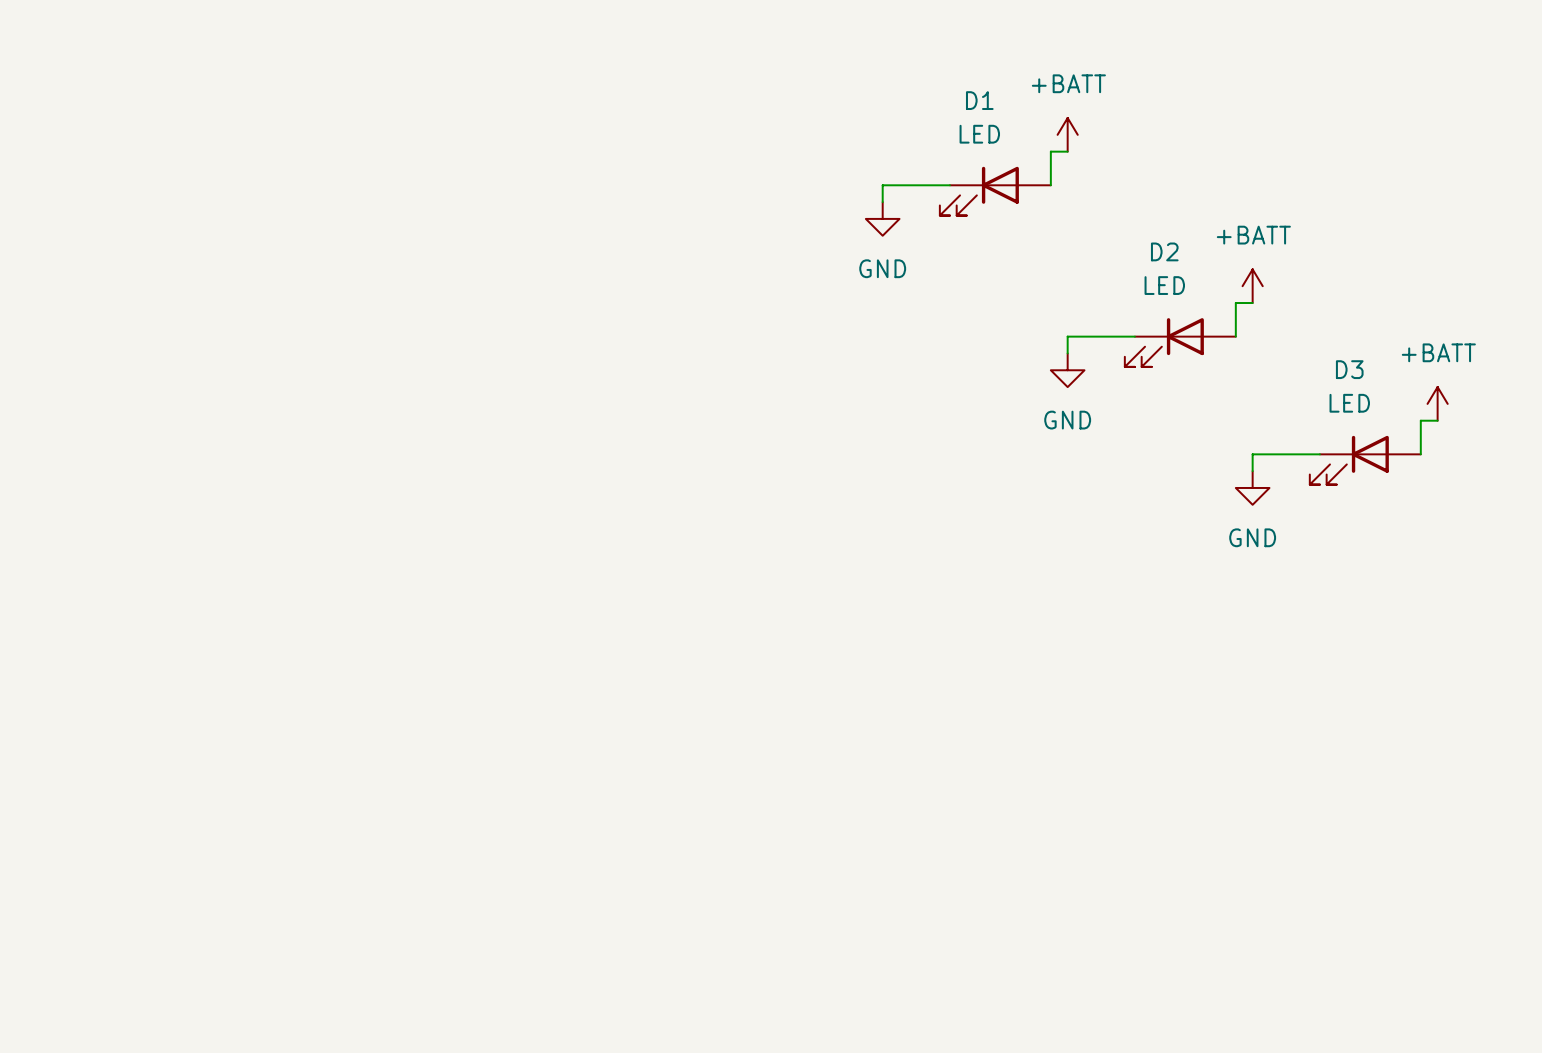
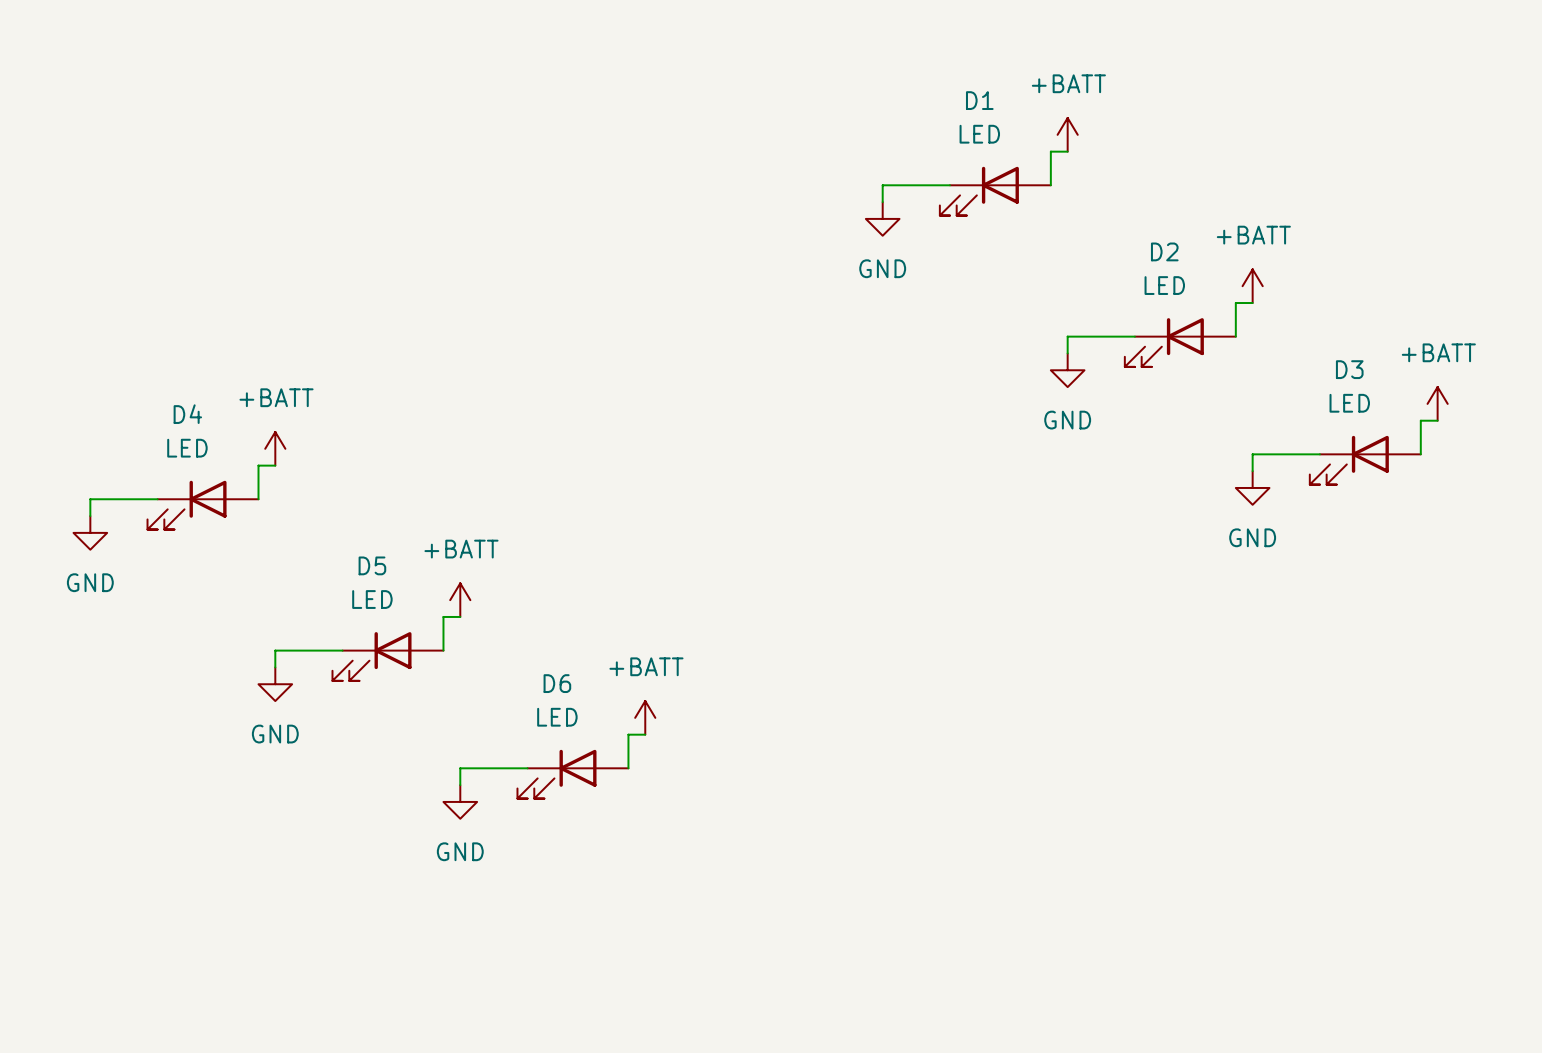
power symbol: none -> +BATT (275, 448)
wire: none -> (275, 465) (258, 465) (258, 499)
wire: none -> (157, 499) (90, 499) (90, 516)
D4: none -> LED (203, 505)
power symbol: none -> GND (90, 532)
power symbol: none -> +BATT (460, 600)
wire: none -> (460, 616) (443, 616) (443, 650)
wire: none -> (342, 650) (275, 650) (275, 667)
D5: none -> LED (387, 656)
power symbol: none -> GND (275, 684)
power symbol: none -> +BATT (645, 717)
wire: none -> (645, 734) (628, 734) (628, 768)
wire: none -> (527, 768) (460, 768) (460, 785)
D6: none -> LED (572, 774)
power symbol: none -> GND (460, 801)

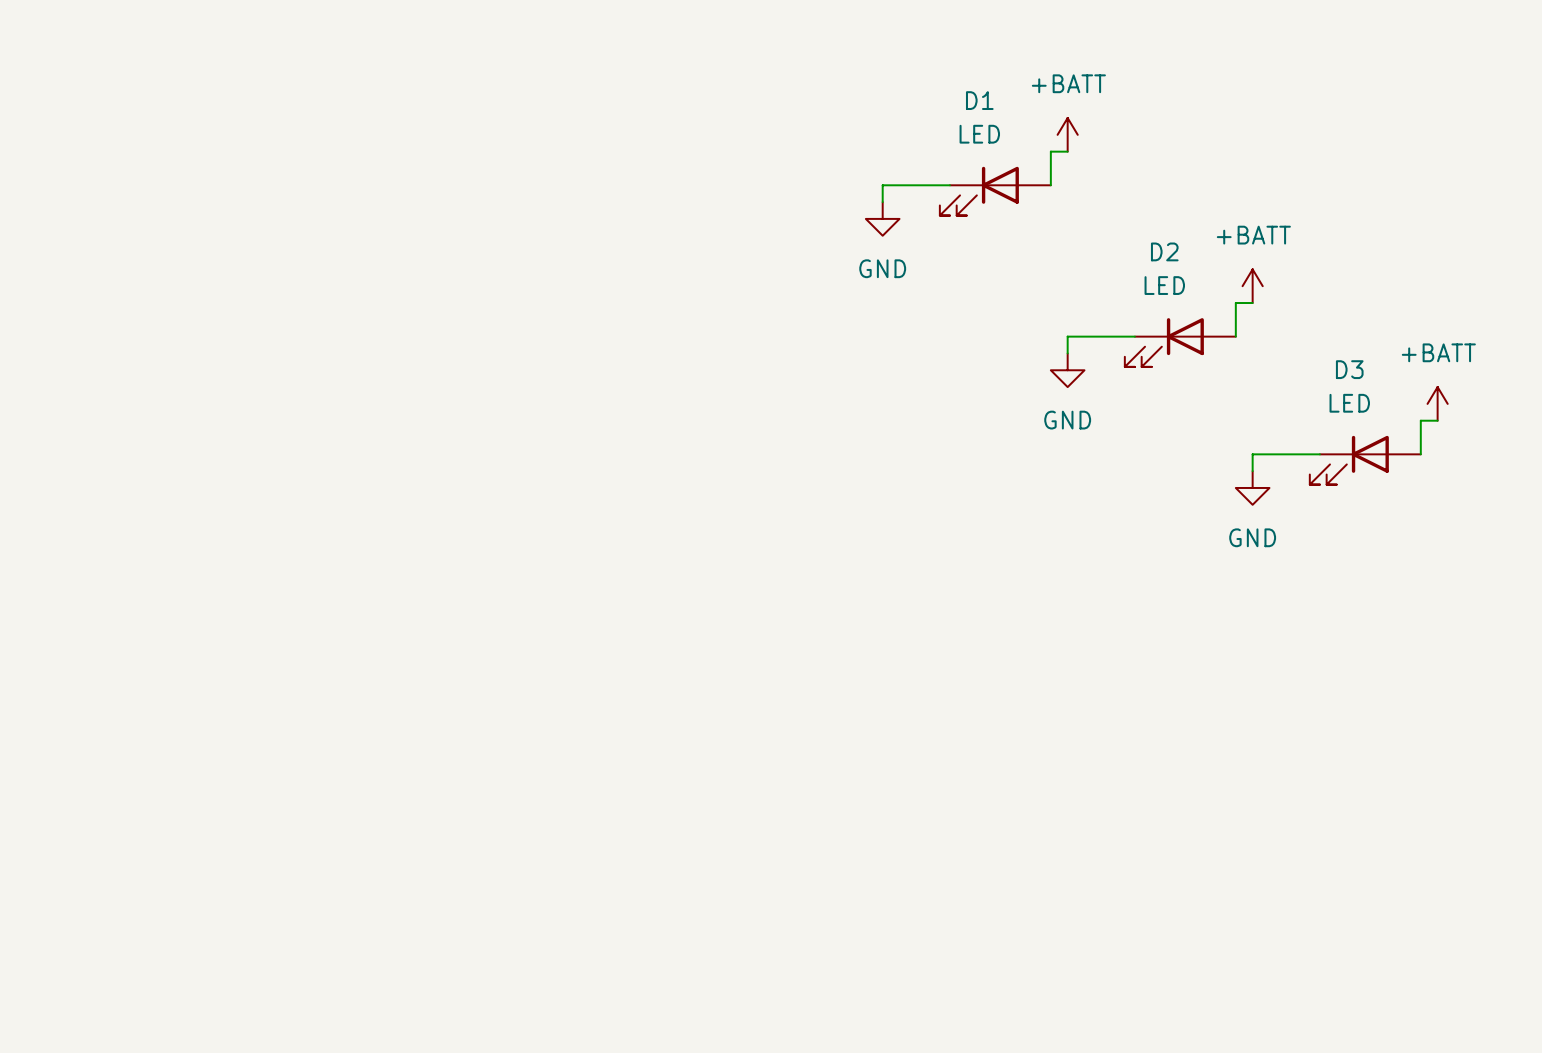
power symbol: +BATT (275, 448) -> none
wire: (275, 465) (258, 465) (258, 499) -> none
wire: (157, 499) (90, 499) (90, 516) -> none
D4: LED (203, 505) -> none
power symbol: GND (90, 532) -> none
power symbol: +BATT (460, 600) -> none
wire: (460, 616) (443, 616) (443, 650) -> none
wire: (342, 650) (275, 650) (275, 667) -> none
D5: LED (387, 656) -> none
power symbol: GND (275, 684) -> none
power symbol: +BATT (645, 717) -> none
wire: (645, 734) (628, 734) (628, 768) -> none
wire: (527, 768) (460, 768) (460, 785) -> none
D6: LED (572, 774) -> none
power symbol: GND (460, 801) -> none

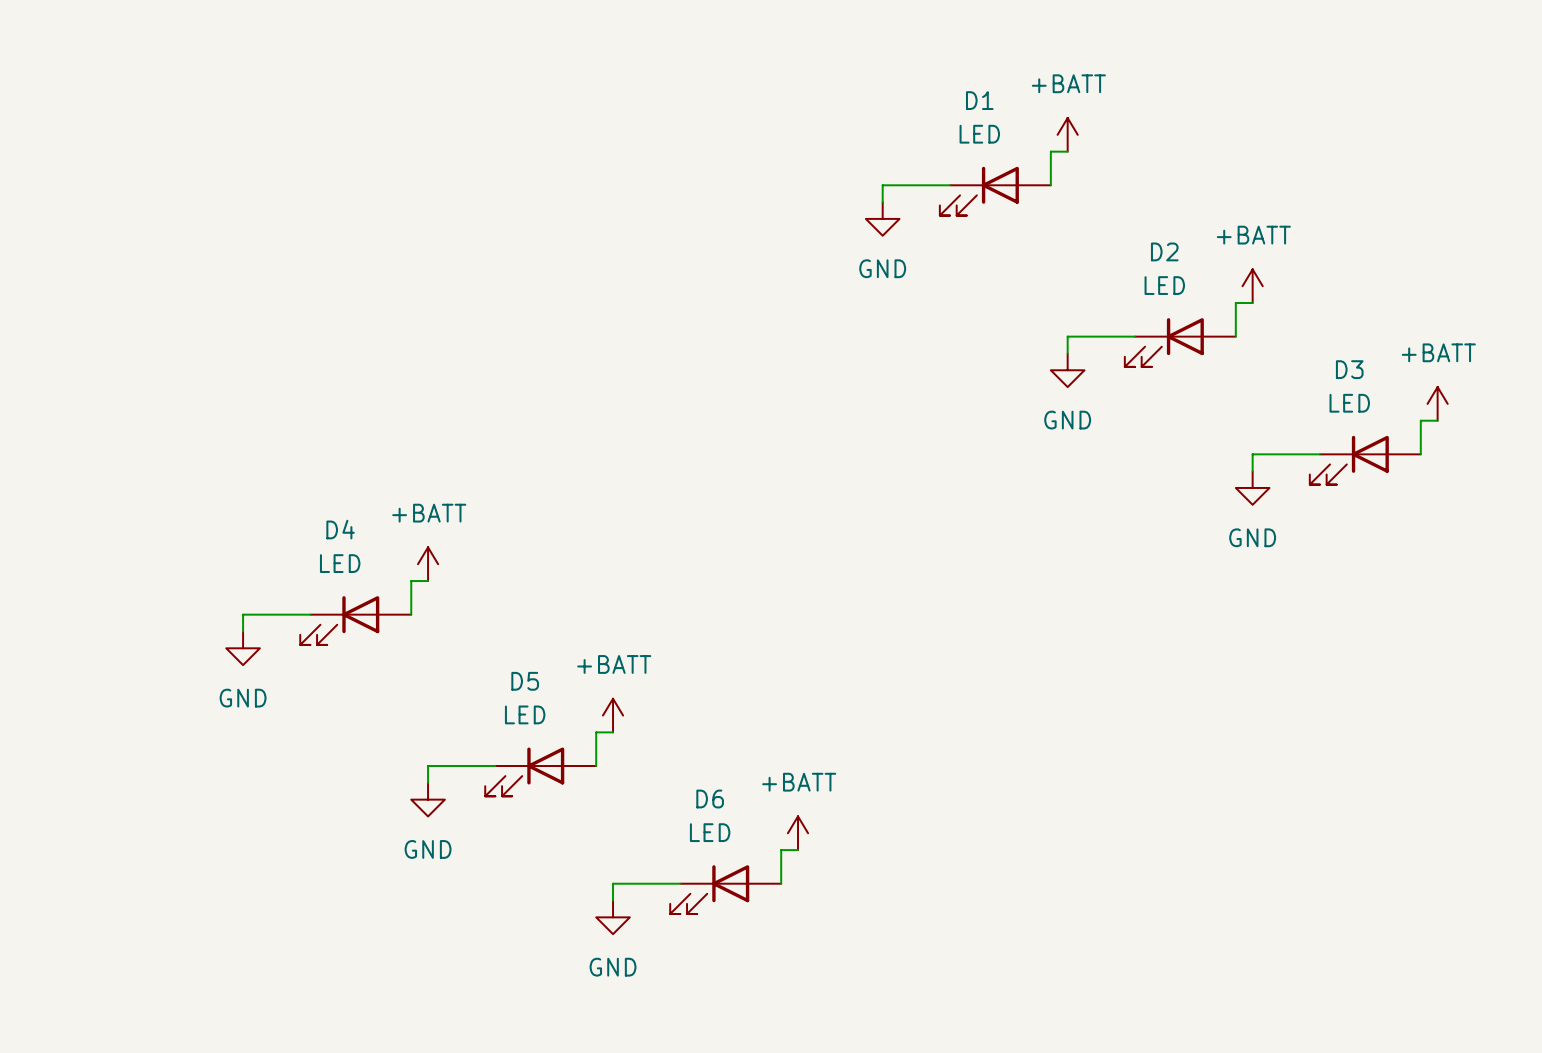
power symbol: none -> +BATT (428, 564)
wire: none -> (428, 581) (411, 581) (411, 614)
wire: none -> (310, 614) (243, 614) (243, 631)
D4: none -> LED (355, 620)
power symbol: none -> GND (243, 648)
power symbol: none -> +BATT (613, 715)
wire: none -> (613, 732) (596, 732) (596, 766)
wire: none -> (495, 766) (428, 766) (428, 782)
D5: none -> LED (540, 771)
power symbol: none -> GND (428, 799)
power symbol: none -> +BATT (798, 833)
wire: none -> (798, 850) (781, 850) (781, 883)
wire: none -> (680, 883) (613, 883) (613, 900)
D6: none -> LED (725, 889)
power symbol: none -> GND (613, 917)

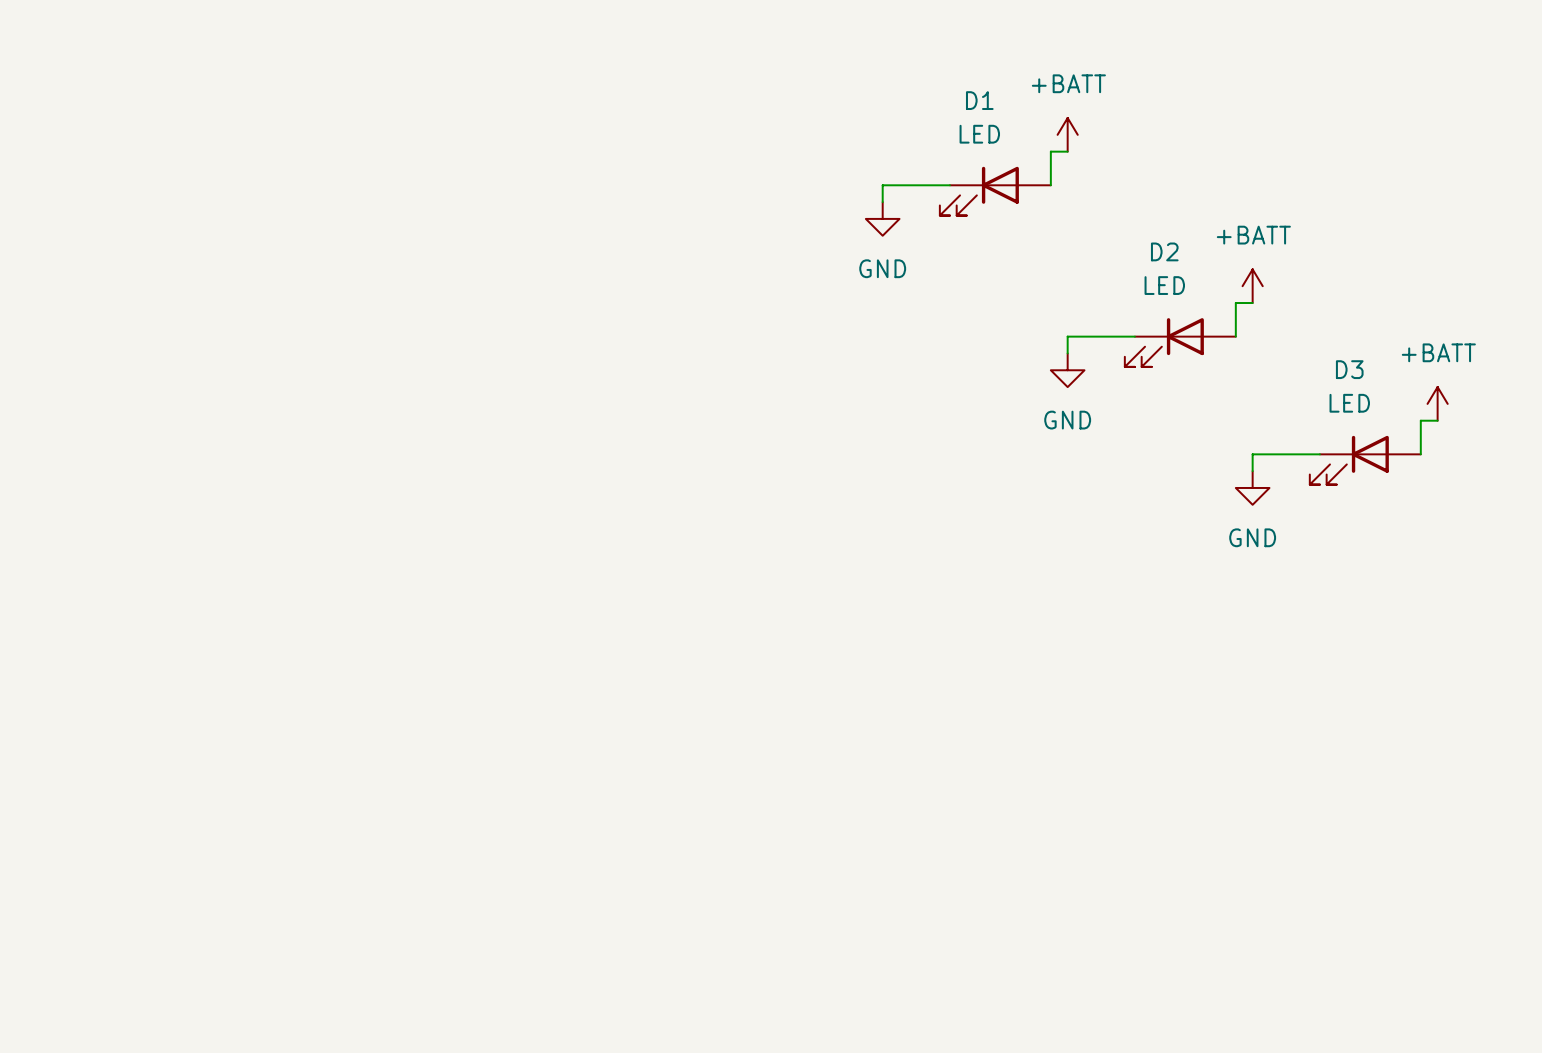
power symbol: +BATT (428, 564) -> none
wire: (428, 581) (411, 581) (411, 614) -> none
wire: (310, 614) (243, 614) (243, 631) -> none
D4: LED (355, 620) -> none
power symbol: GND (243, 648) -> none
power symbol: +BATT (613, 715) -> none
wire: (613, 732) (596, 732) (596, 766) -> none
wire: (495, 766) (428, 766) (428, 782) -> none
D5: LED (540, 771) -> none
power symbol: GND (428, 799) -> none
power symbol: +BATT (798, 833) -> none
wire: (798, 850) (781, 850) (781, 883) -> none
wire: (680, 883) (613, 883) (613, 900) -> none
D6: LED (725, 889) -> none
power symbol: GND (613, 917) -> none

